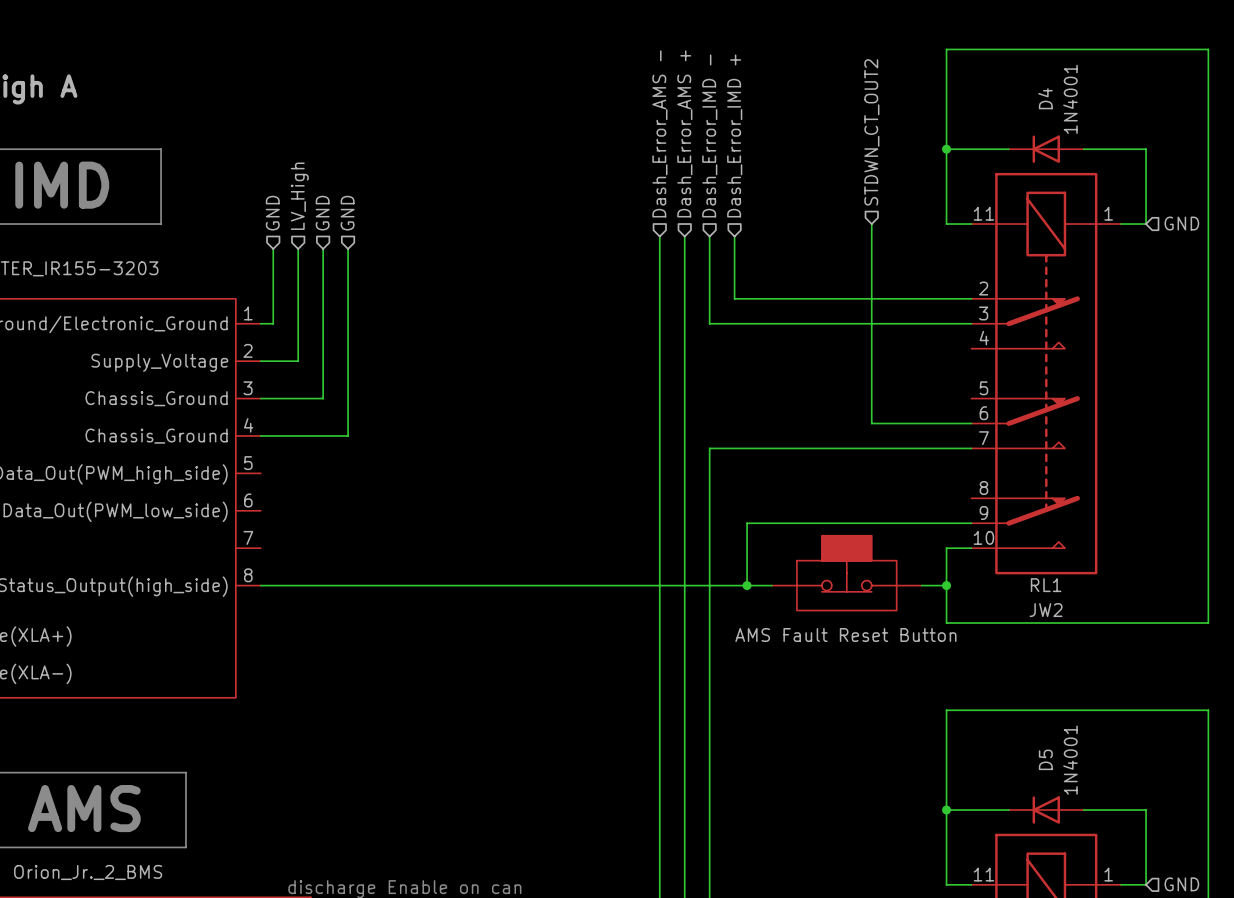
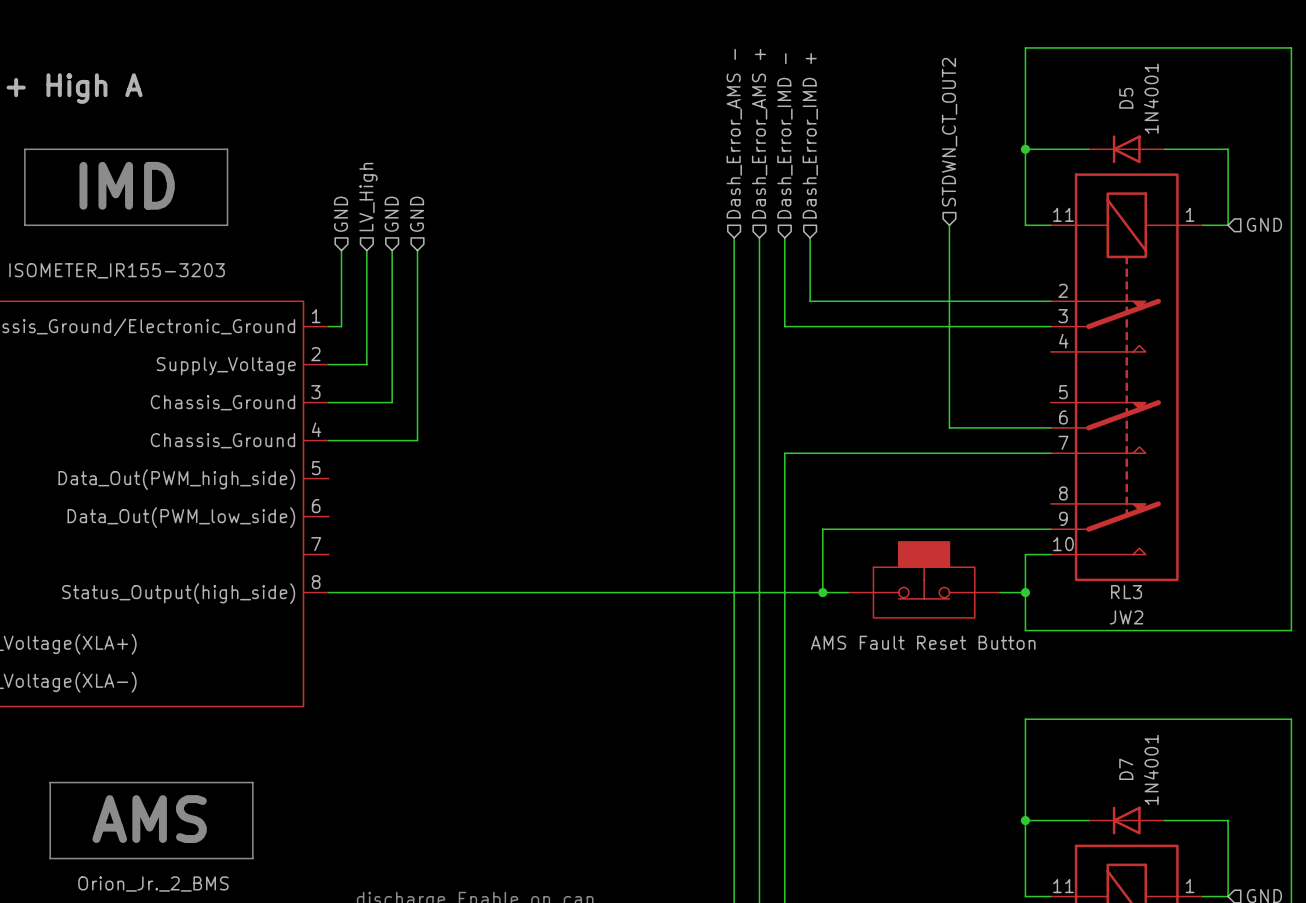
D4 name: D4 (1045, 98) -> D5 (1126, 98)
RL1 name: RL1 (1046, 585) -> RL3 (1126, 592)
D5 name: D5 (1045, 759) -> D7 (1126, 769)

